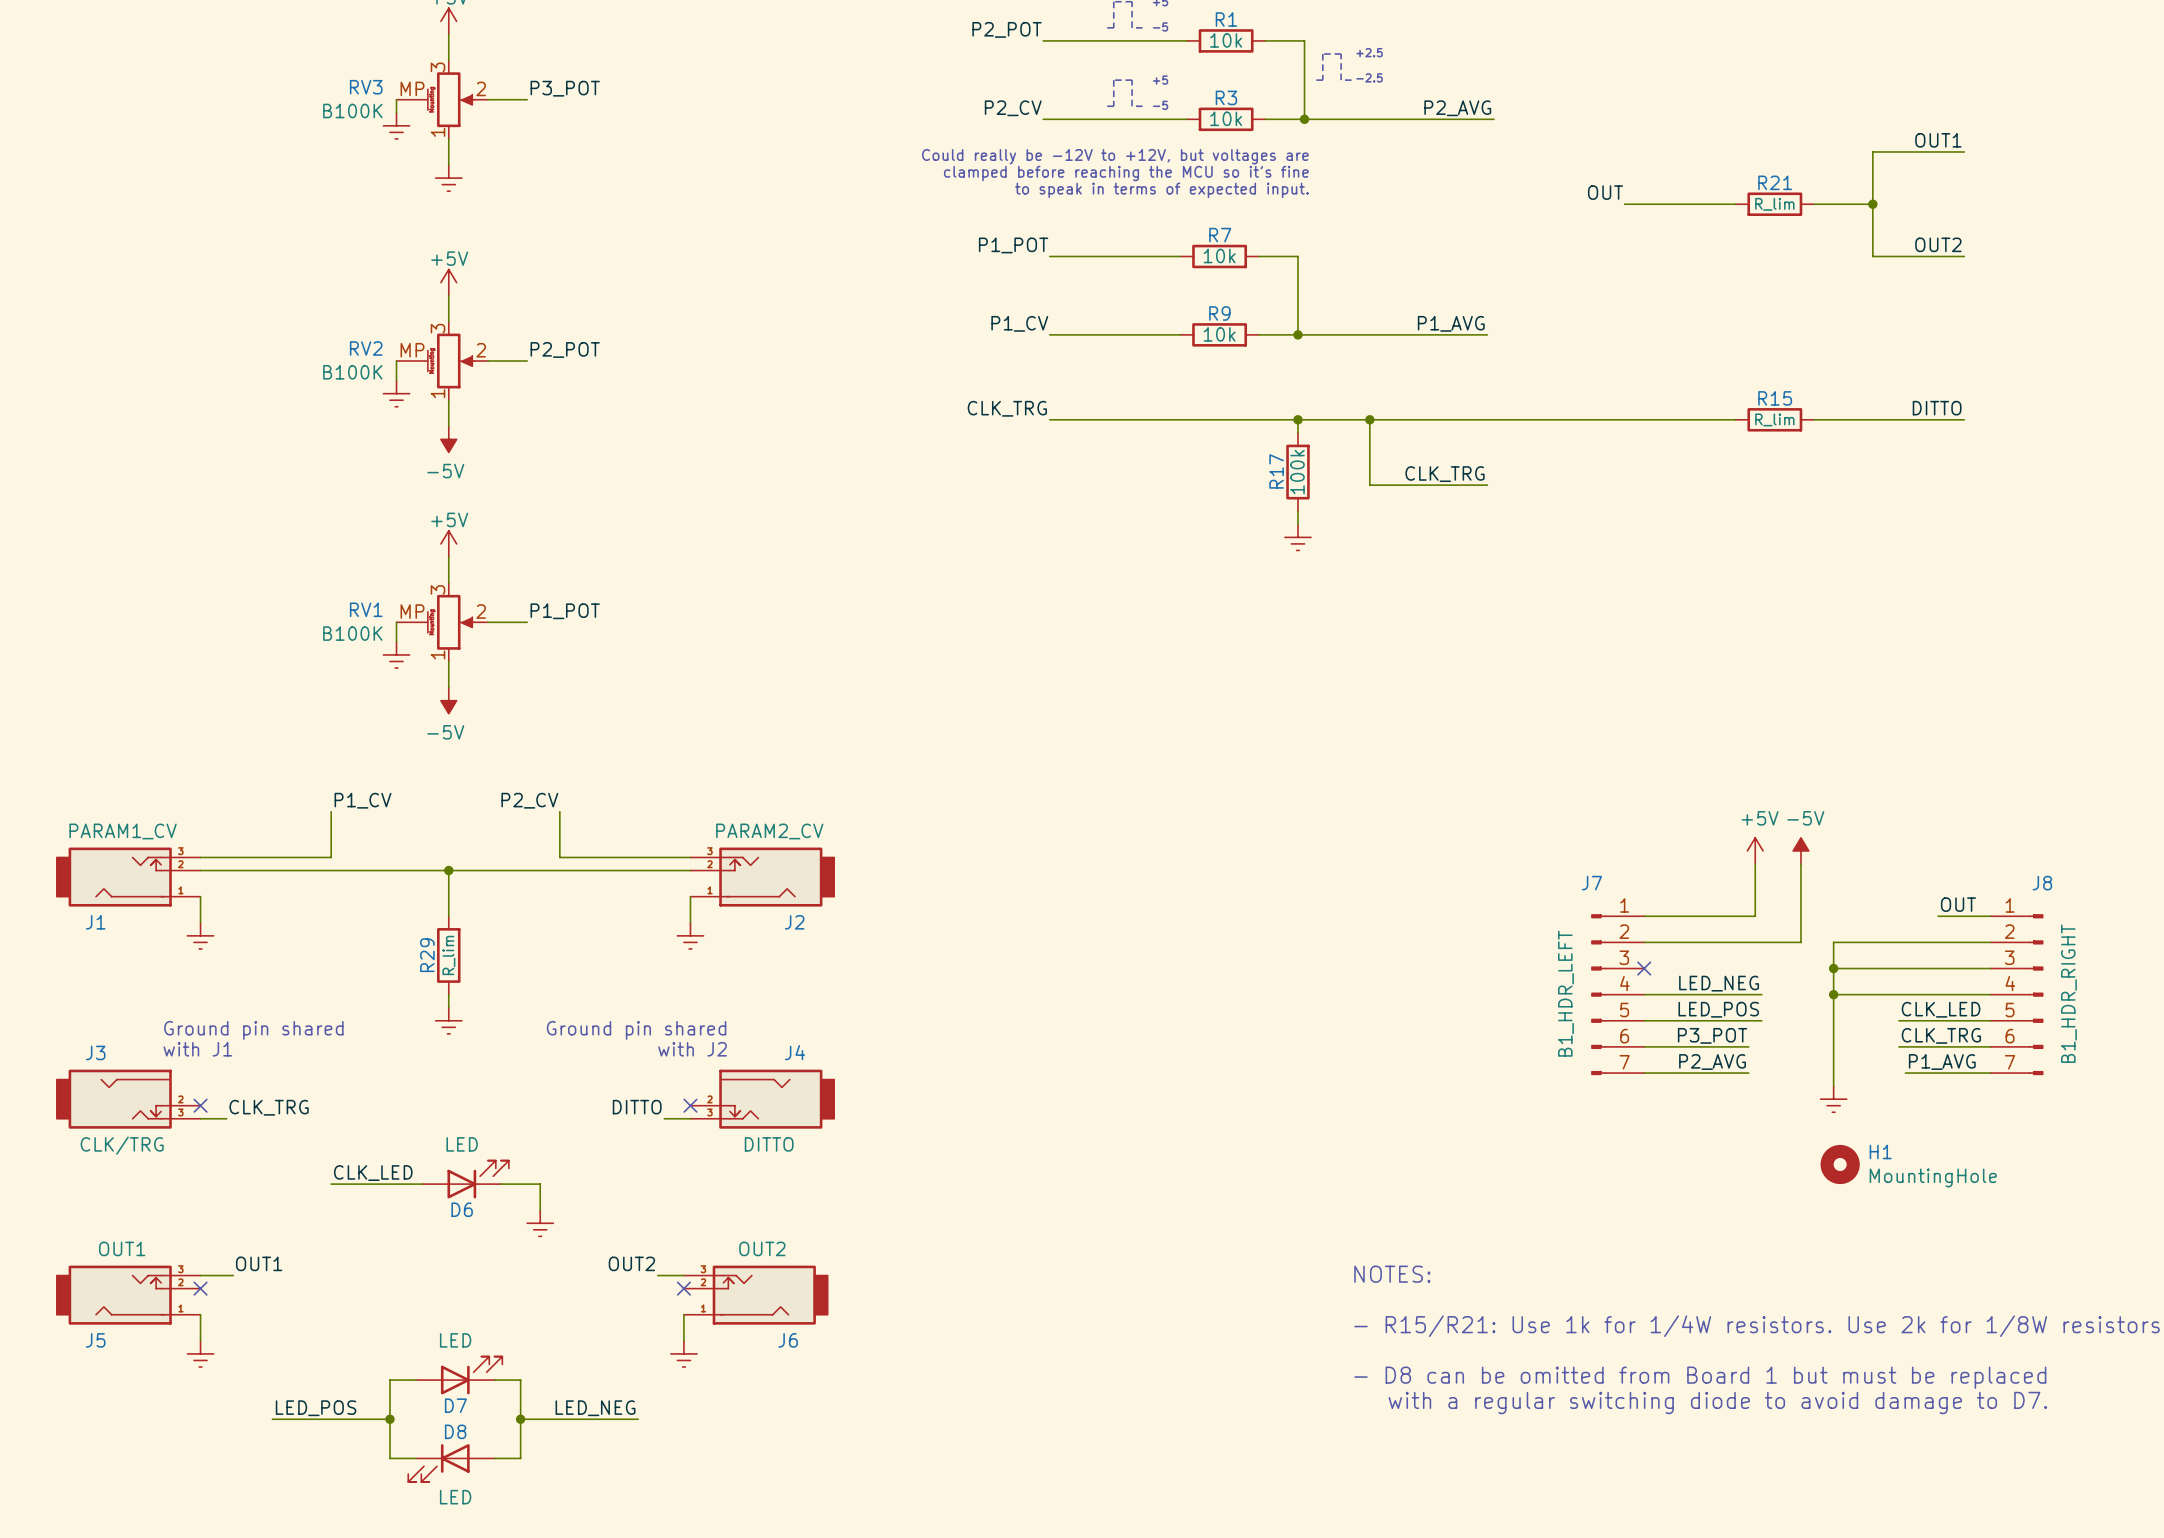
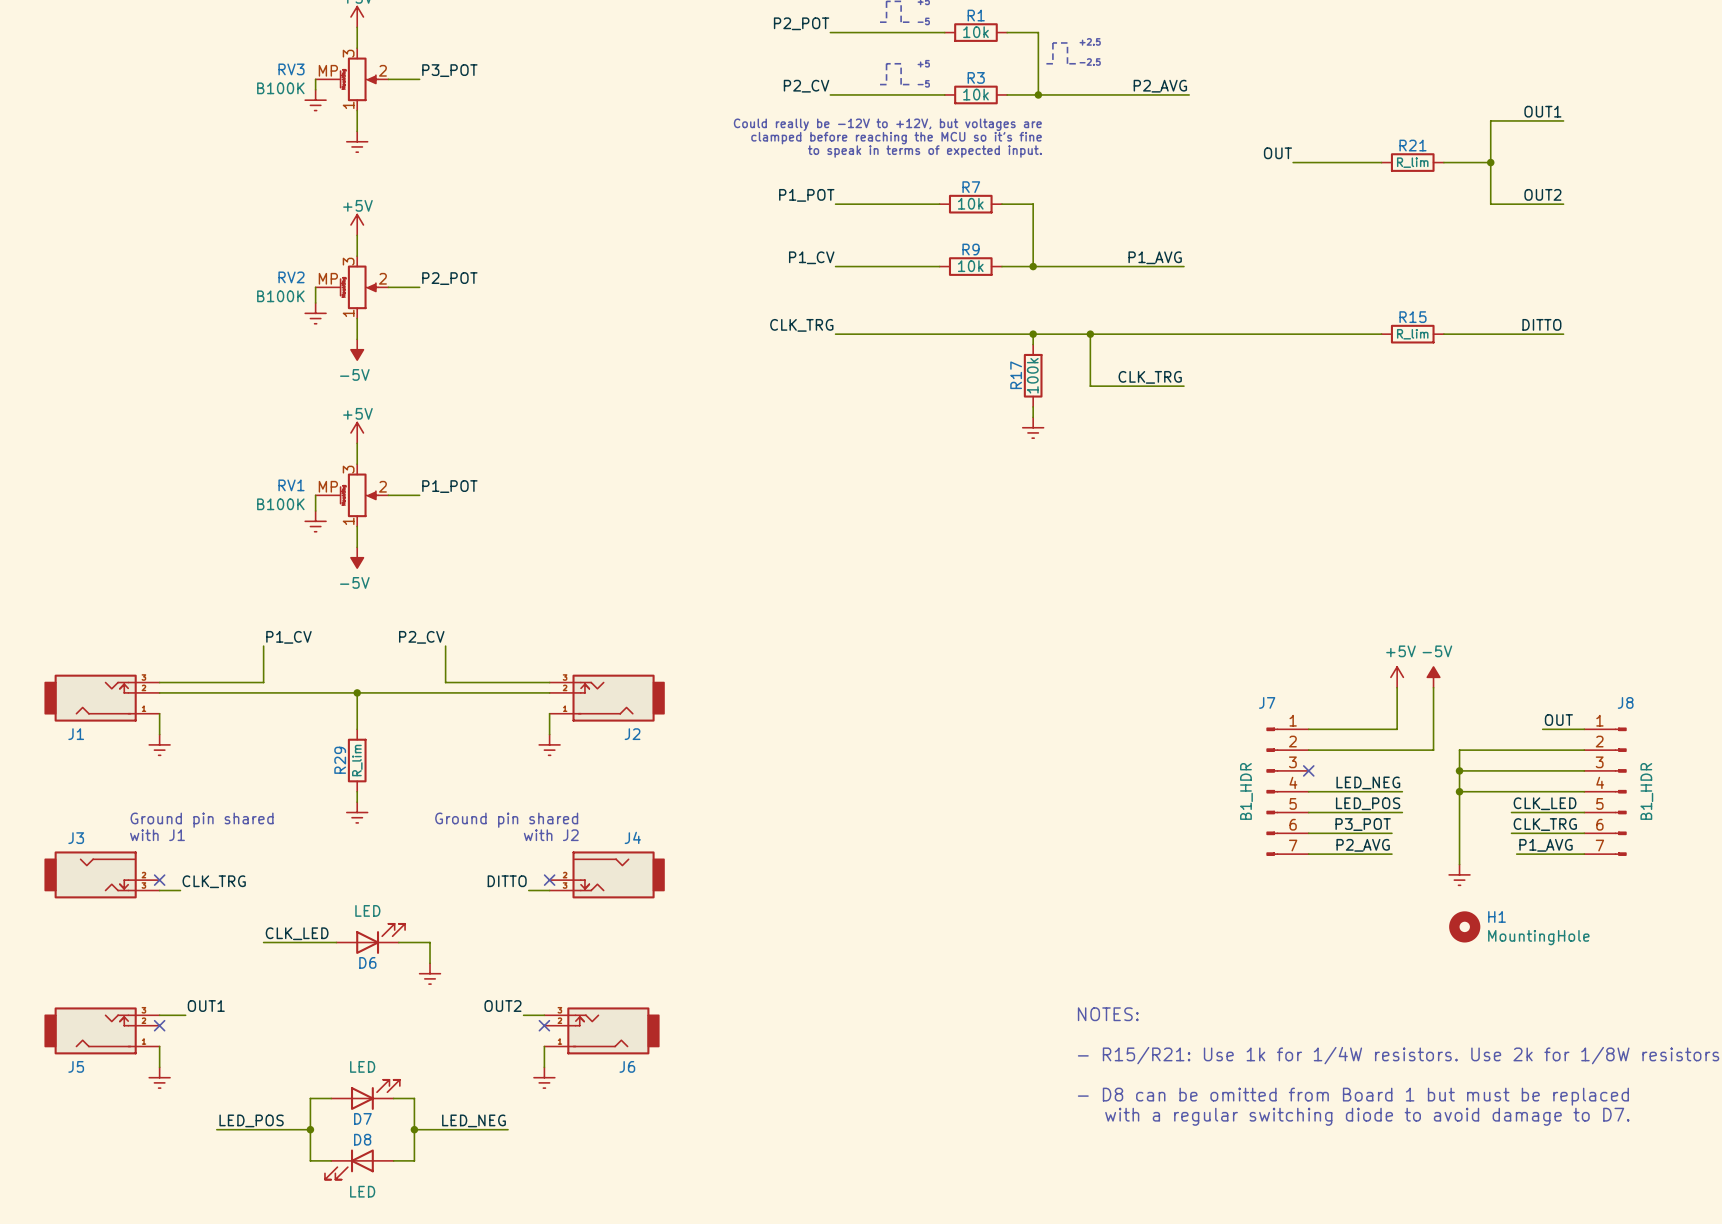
J1 value: PARAM1_CV (123, 831) -> none
J2 value: PARAM2_CV (769, 831) -> none
J7 value: B1_HDR_LEFT (1565, 993) -> B1_HDR (1246, 791)
J8 value: B1_HDR_RIGHT (2068, 993) -> B1_HDR (1646, 791)
J4 value: DITTO (769, 1144) -> none
J3 value: CLK/TRG (122, 1145) -> none
J5 value: OUT1 (122, 1248) -> none
J6 value: OUT2 (762, 1248) -> none

